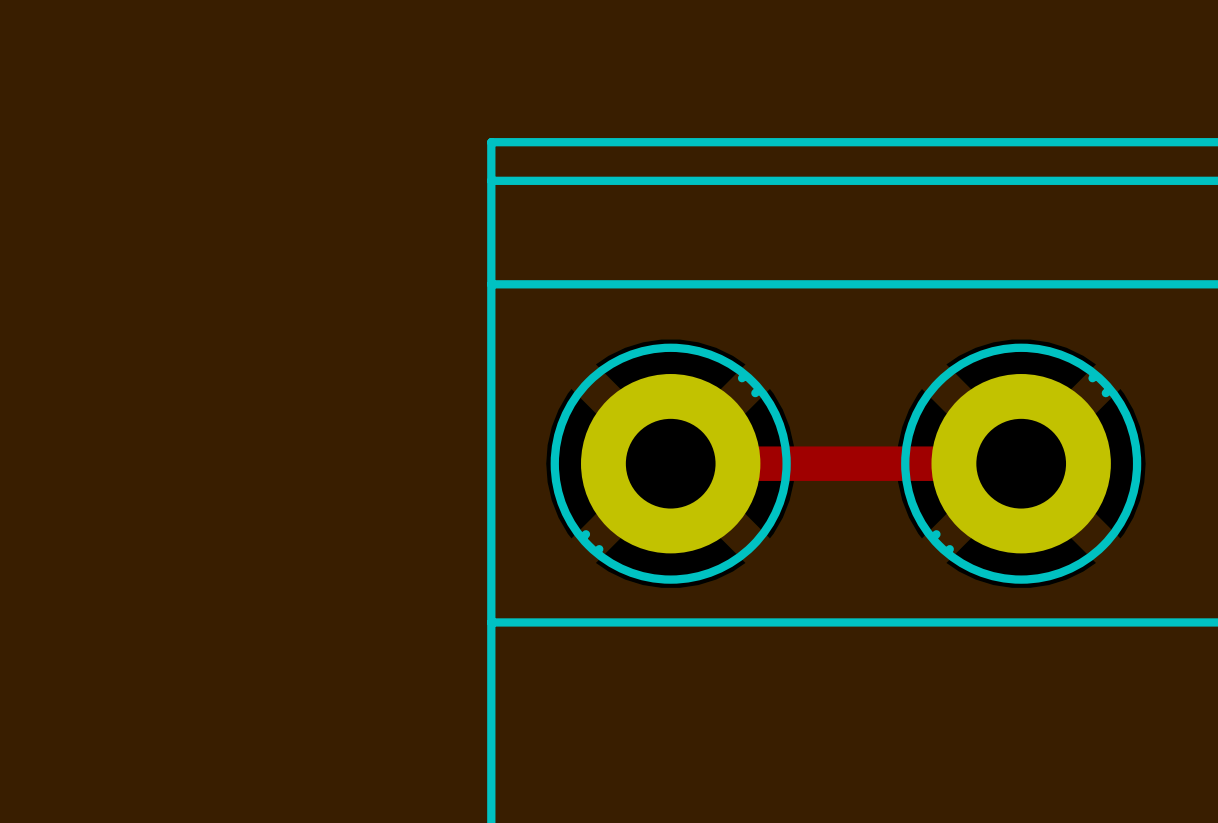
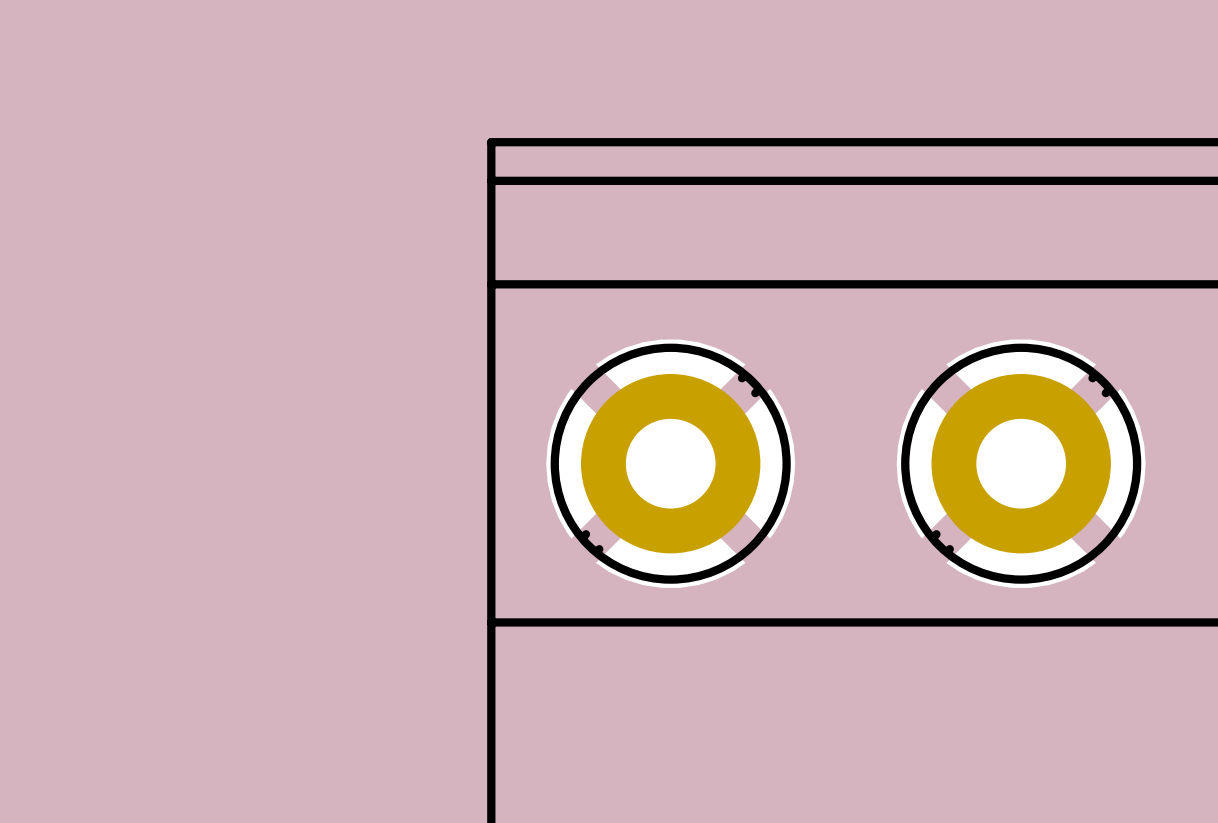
top track: (670, 463) (1021, 463) -> none

